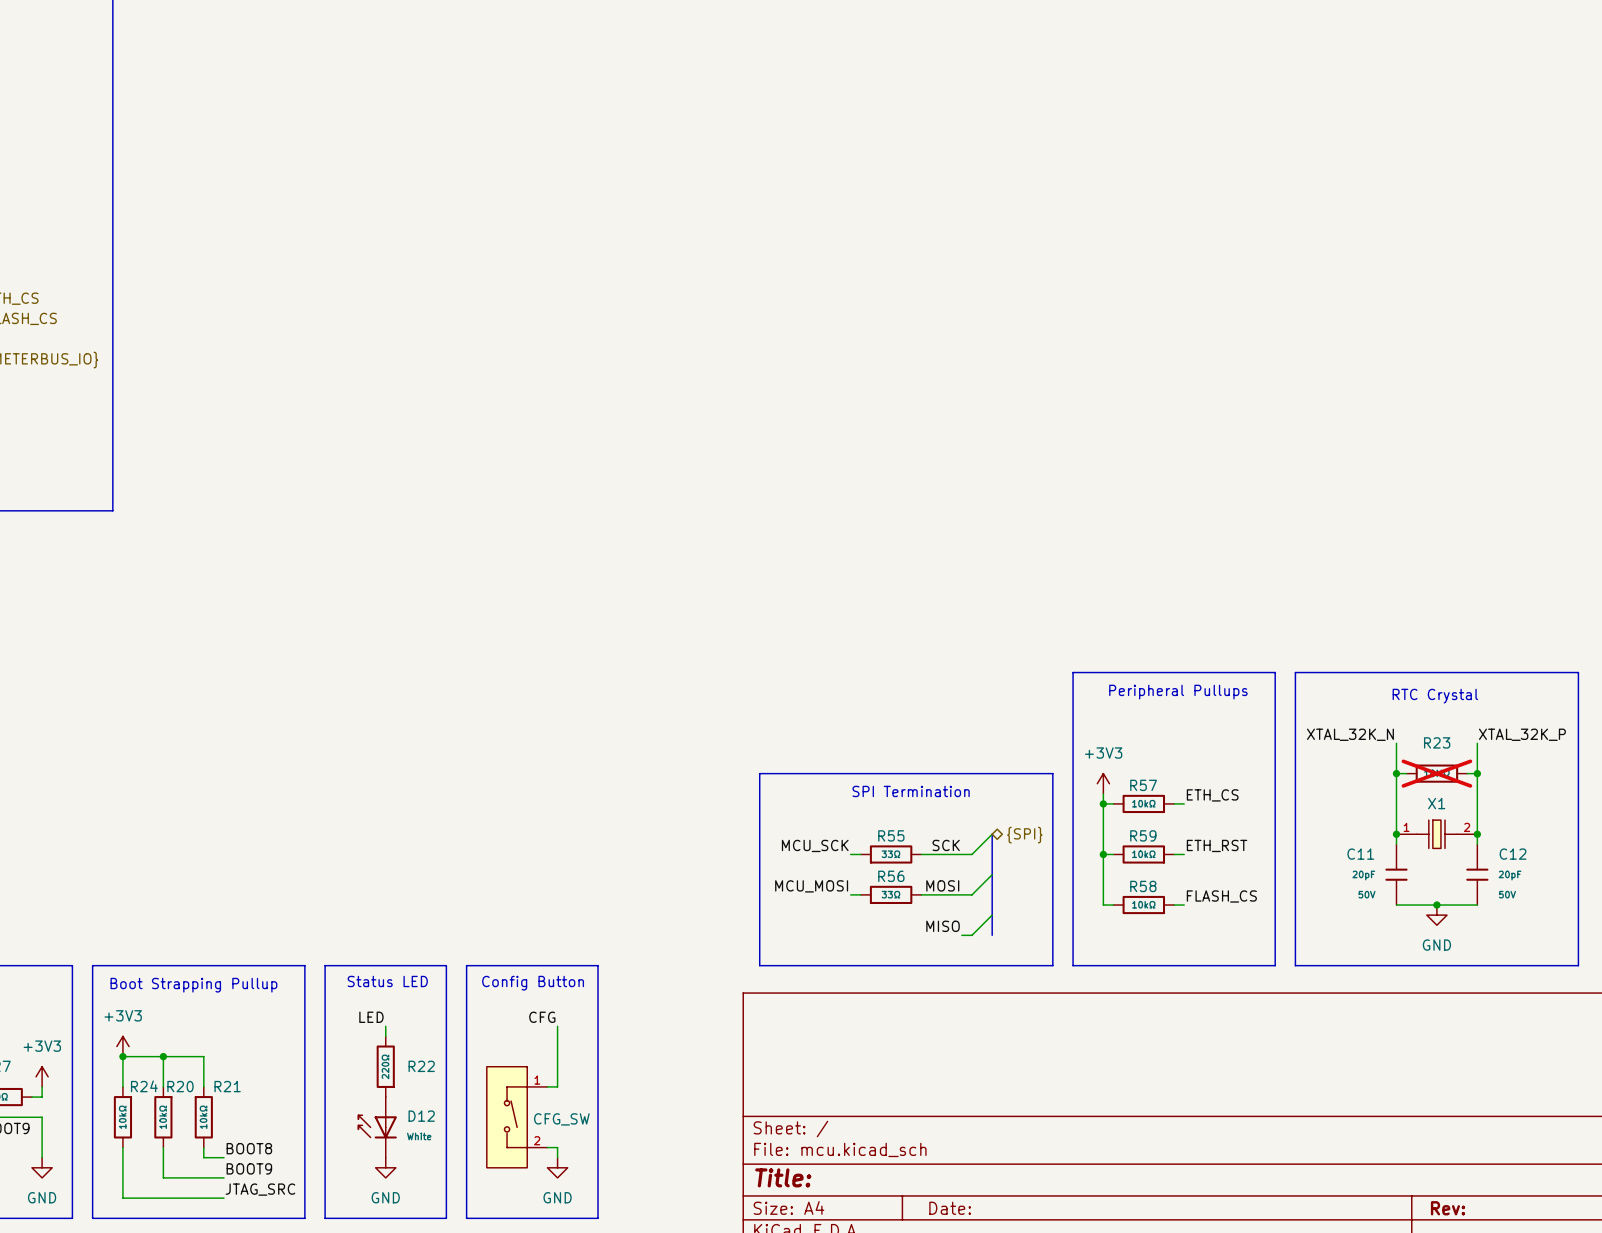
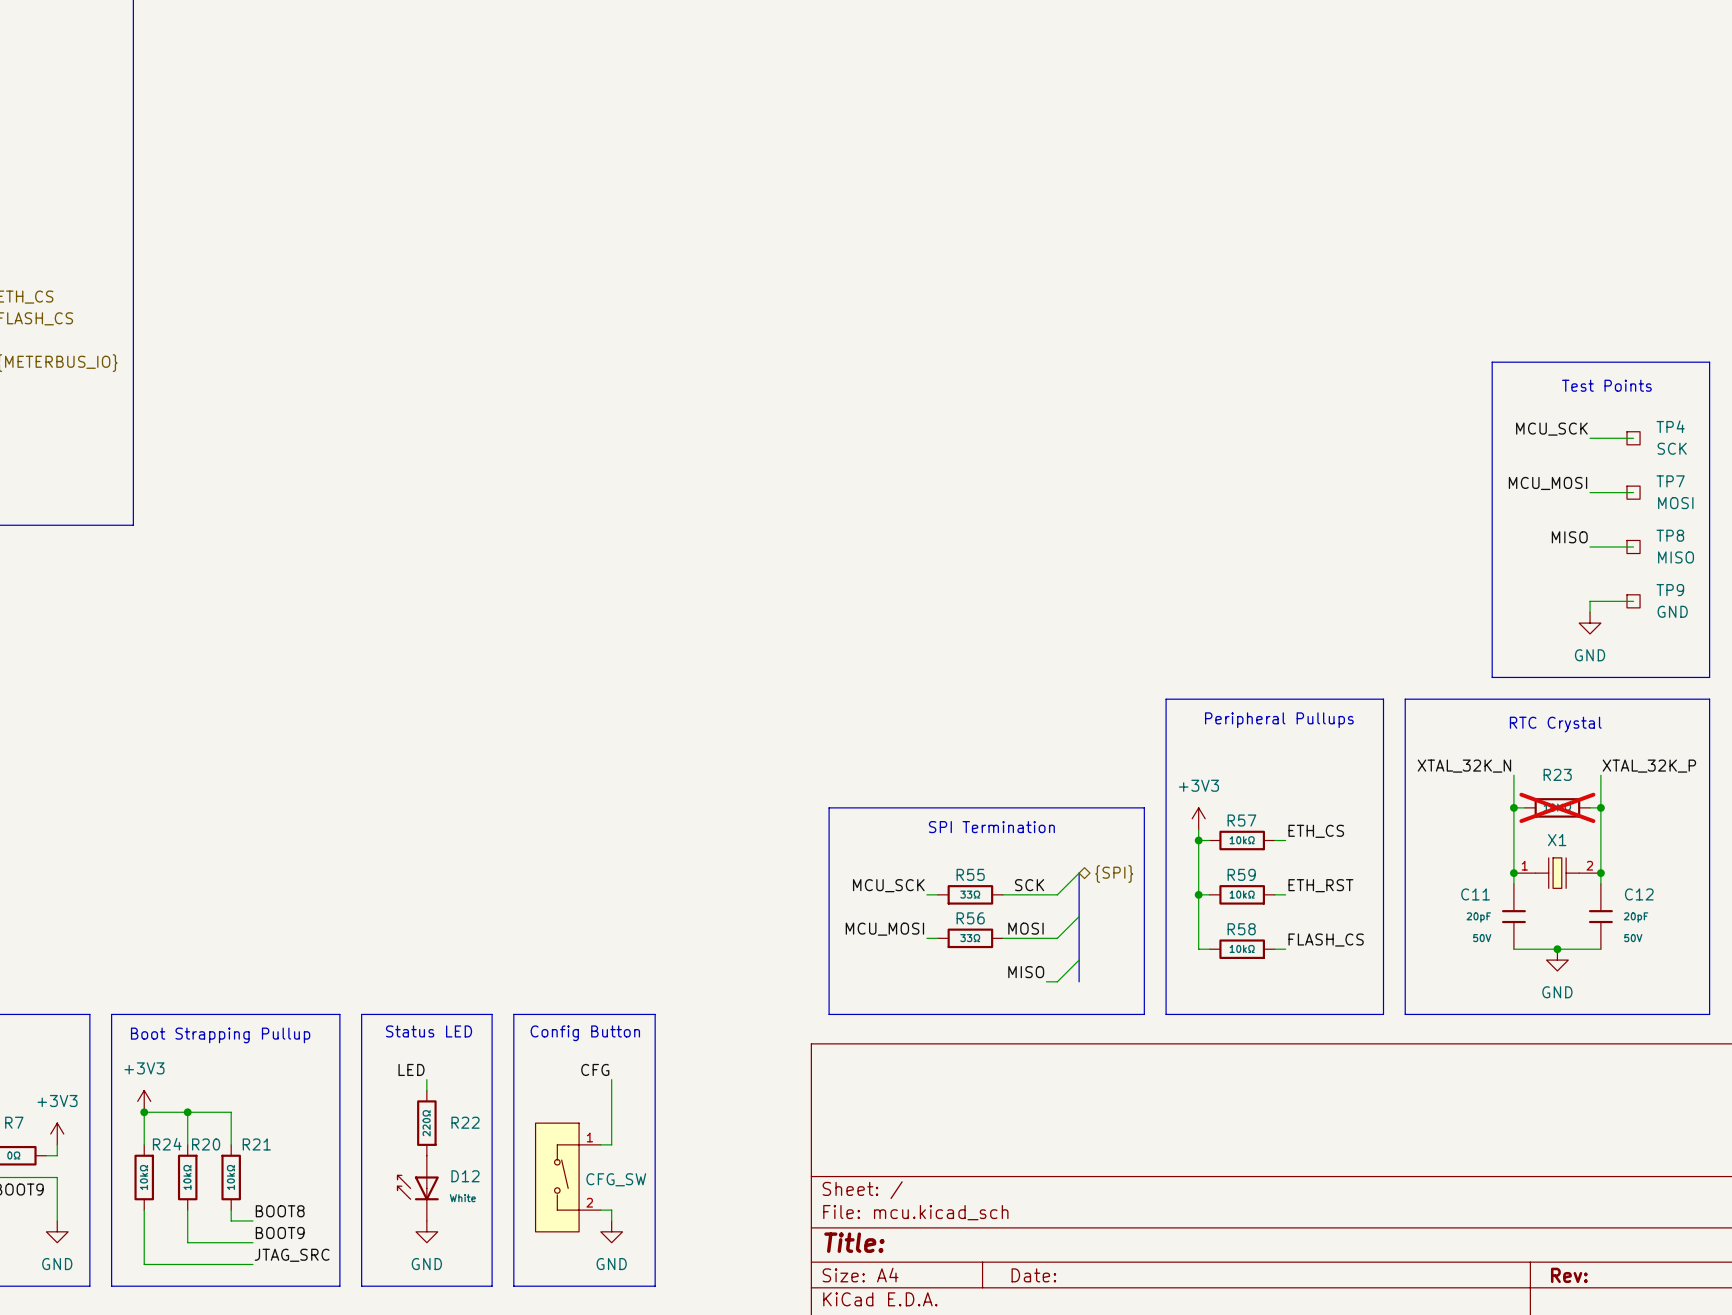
line: none -> (1492, 362) (1709, 362) (1709, 677) (1492, 677) (1492, 362)
text: none -> Test Points (1606, 385)
label: none -> MCU_SCK (1551, 429)
wire: none -> (1590, 438) (1633, 438)
TP4: none -> SCK (1633, 438)
label: none -> MCU_MOSI (1548, 483)
wire: none -> (1590, 492) (1633, 492)
TP7: none -> MOSI (1633, 492)
label: none -> MISO (1569, 537)
wire: none -> (1590, 546) (1633, 546)
TP8: none -> MISO (1633, 546)
wire: none -> (1633, 601) (1590, 601) (1590, 612)
TP9: none -> GND (1633, 601)
power symbol: none -> GND (1590, 623)

